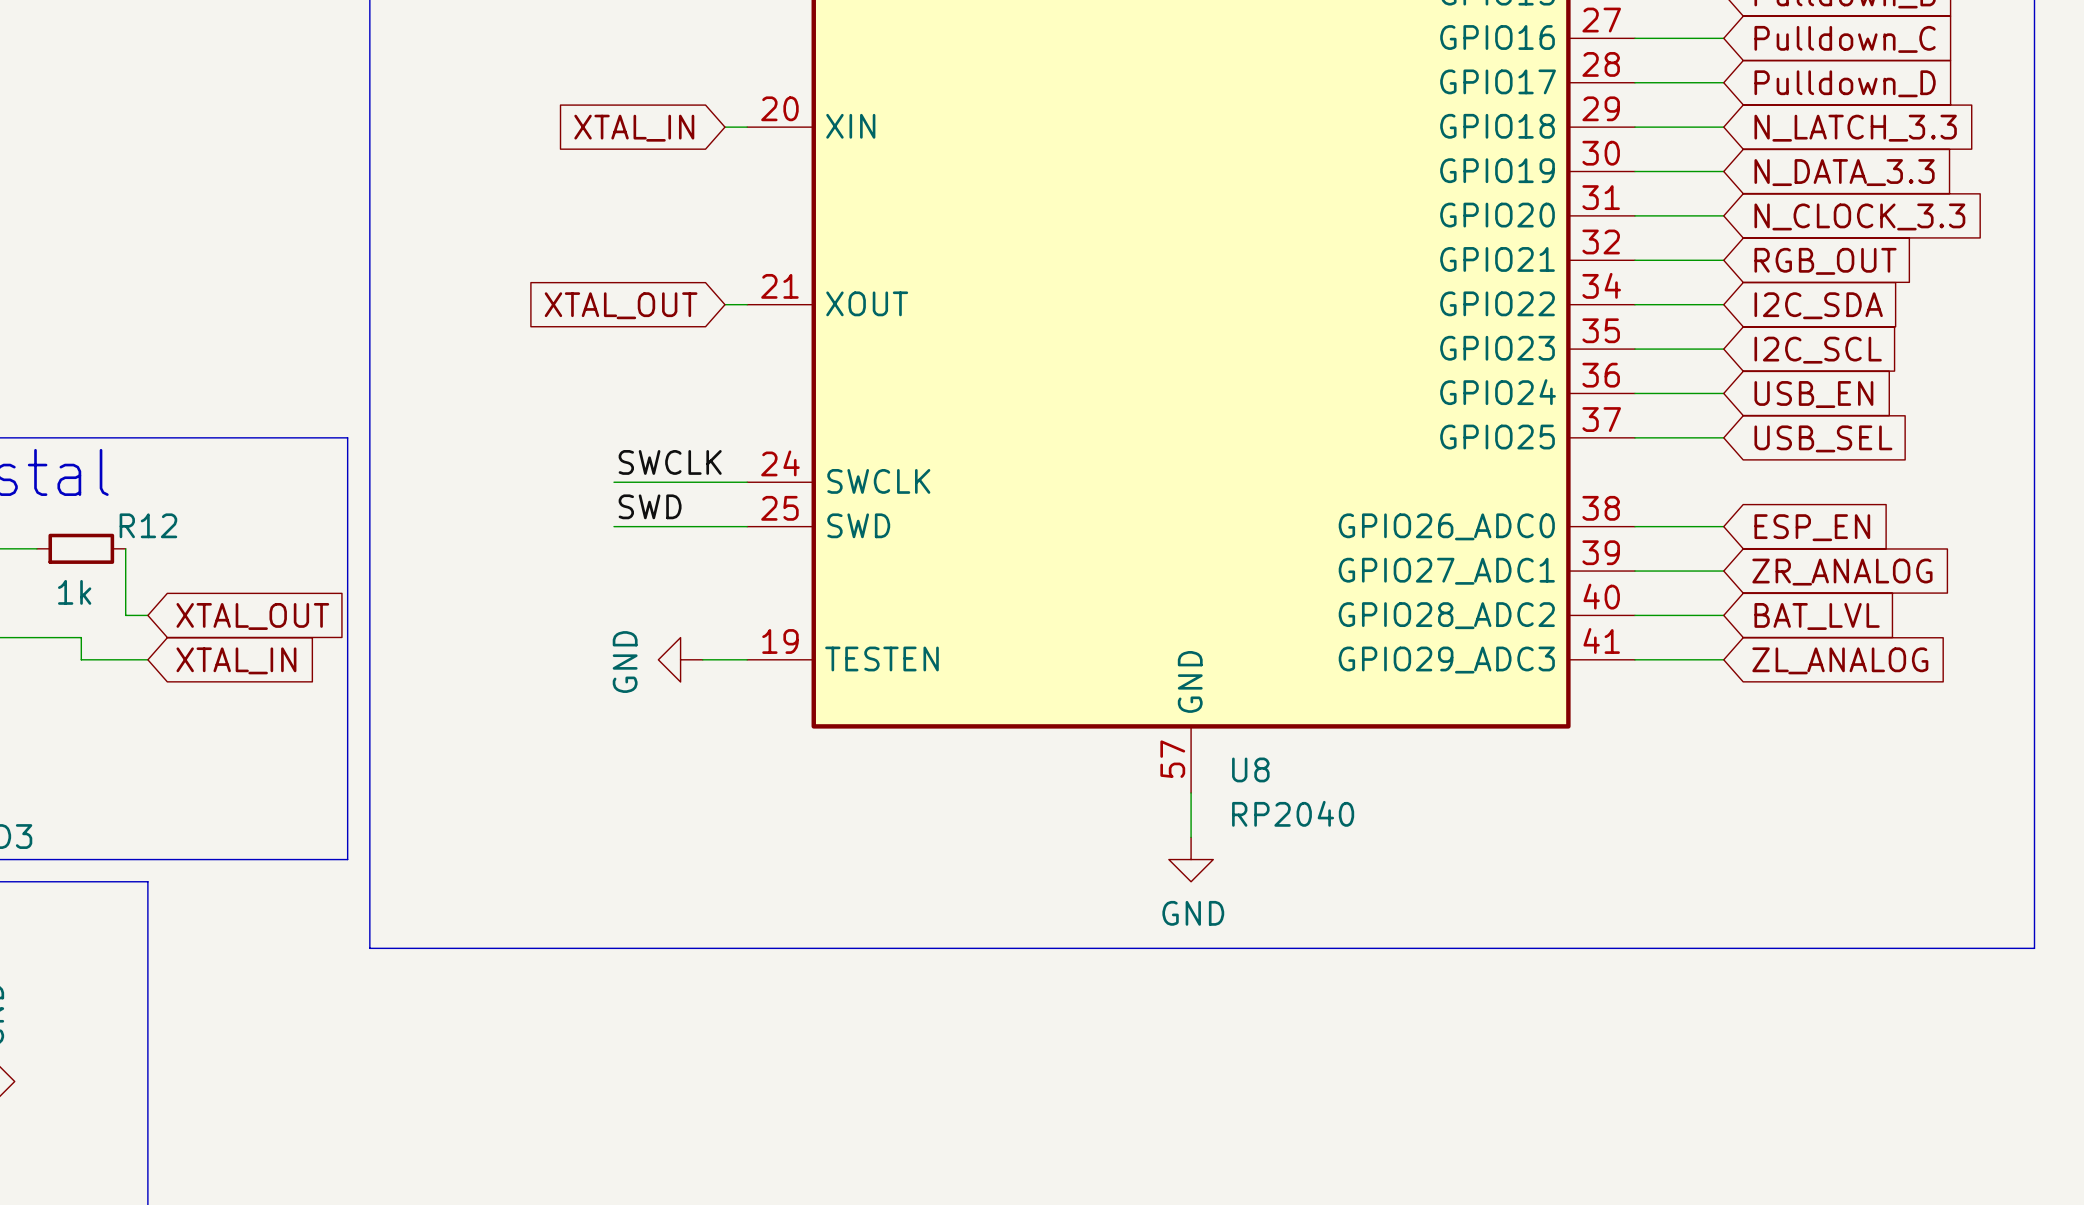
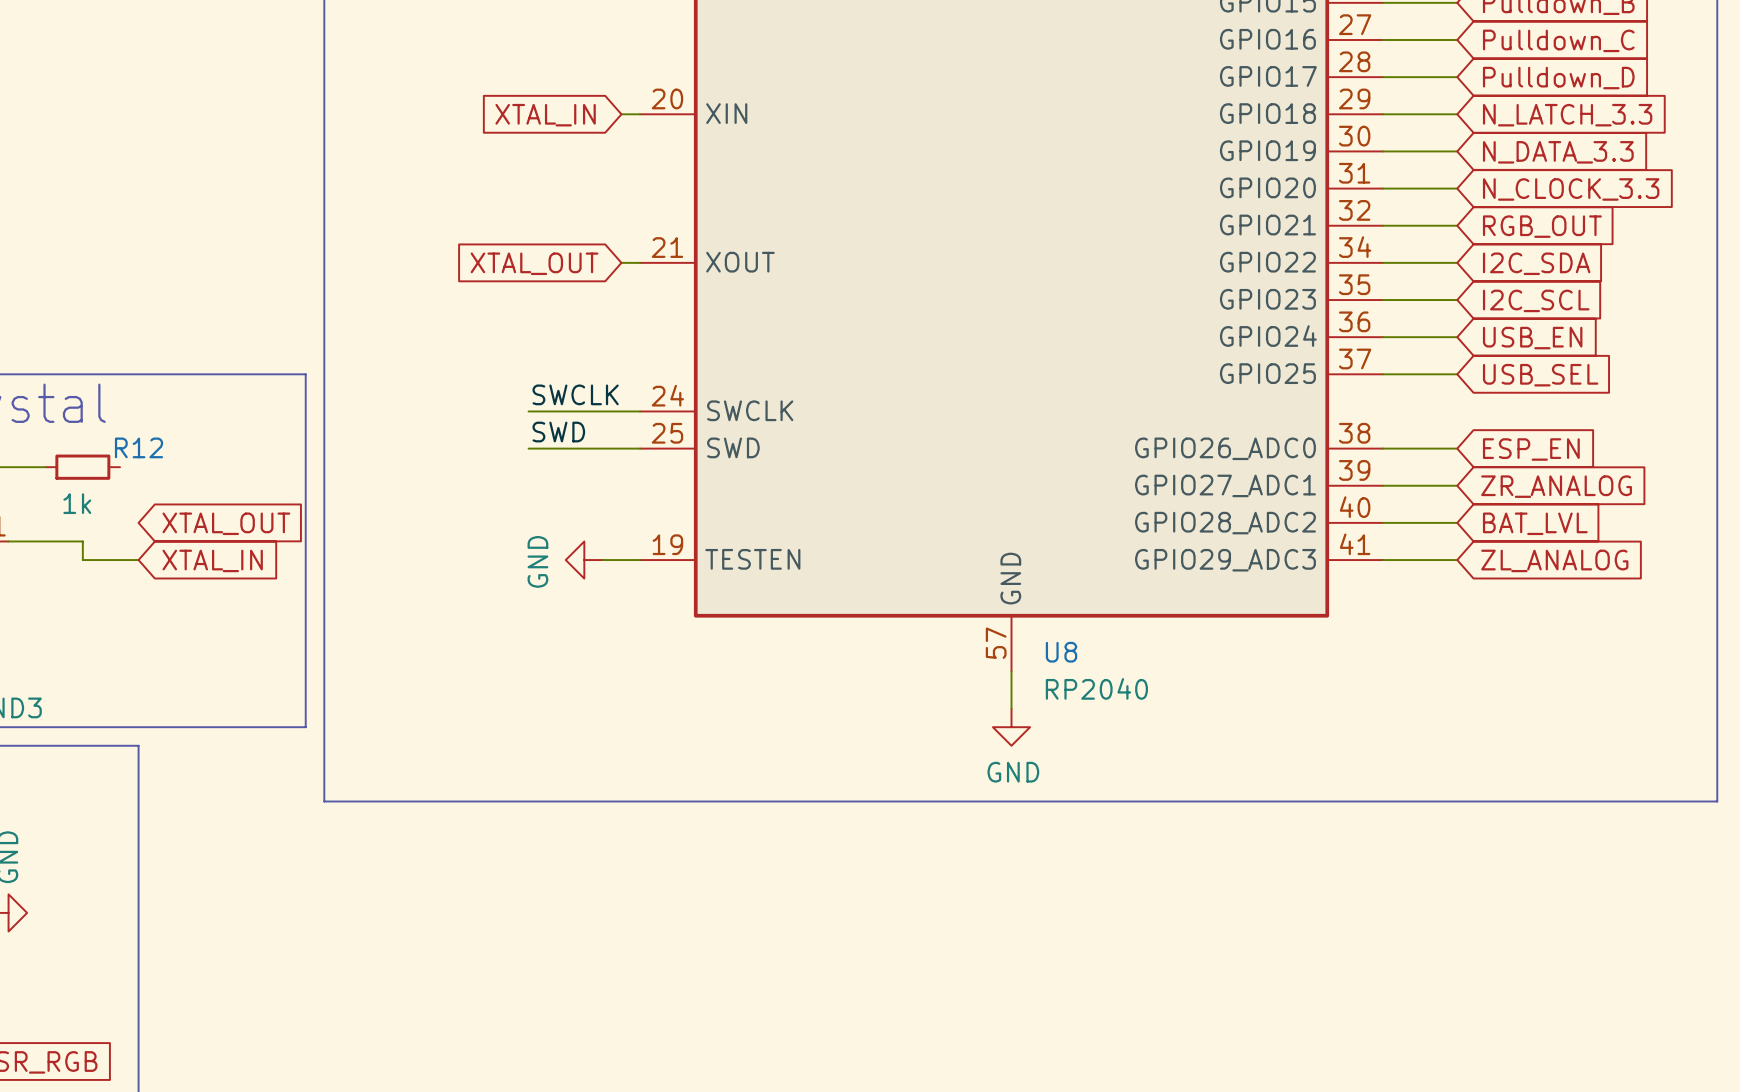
wire: (125, 548) (125, 615) (147, 615) -> none

